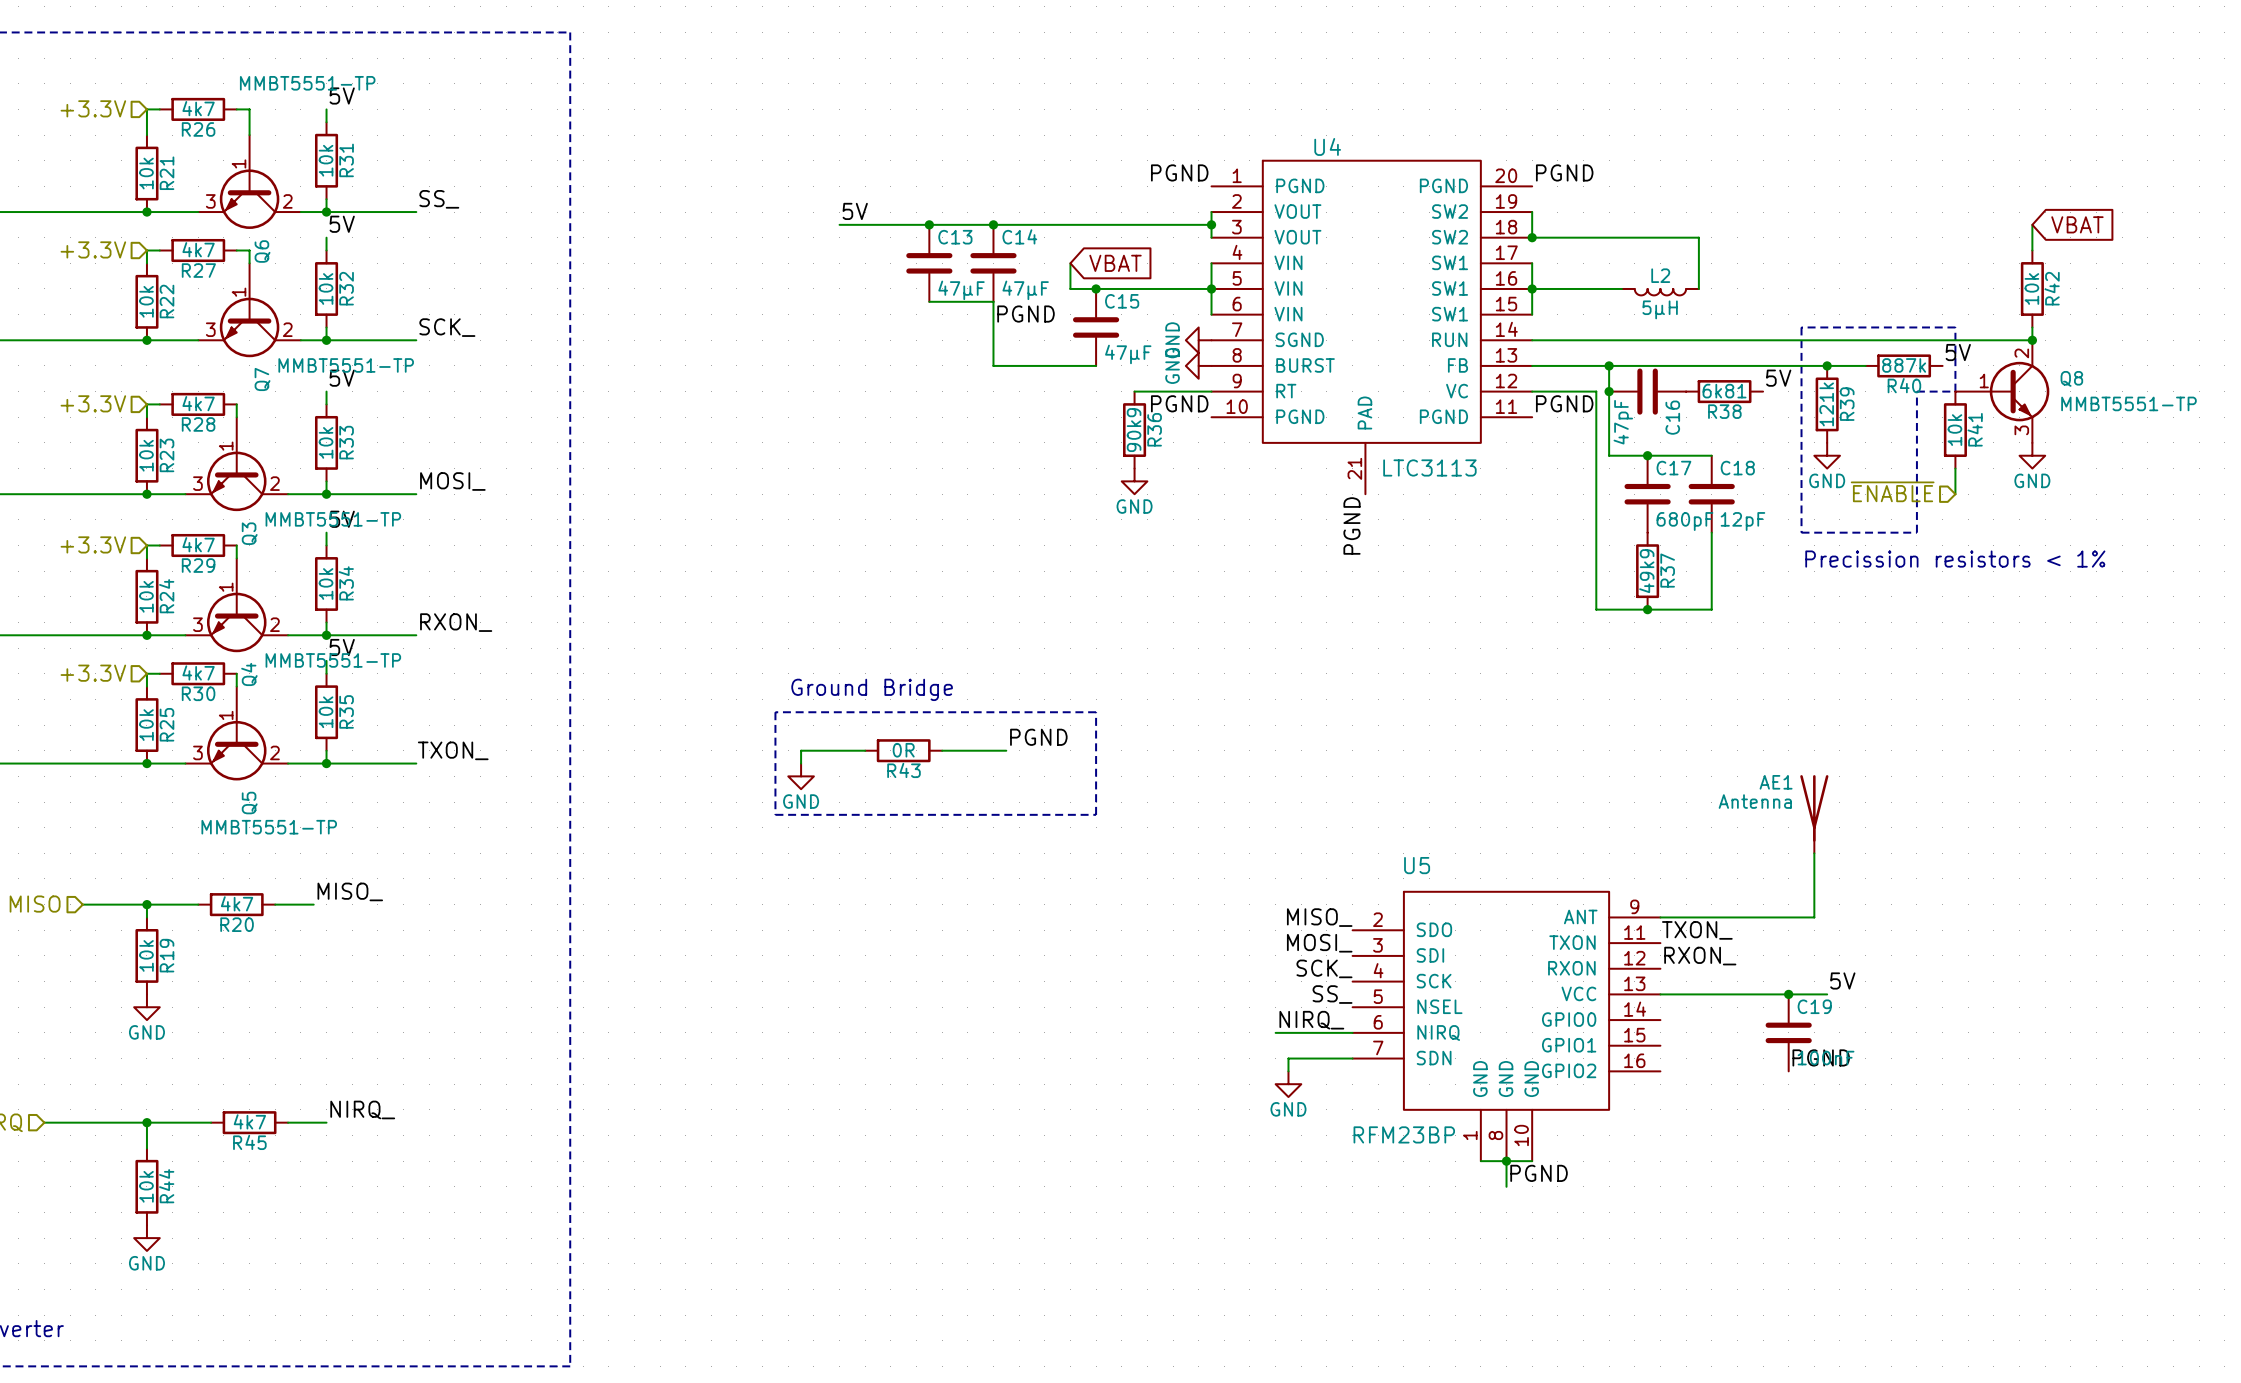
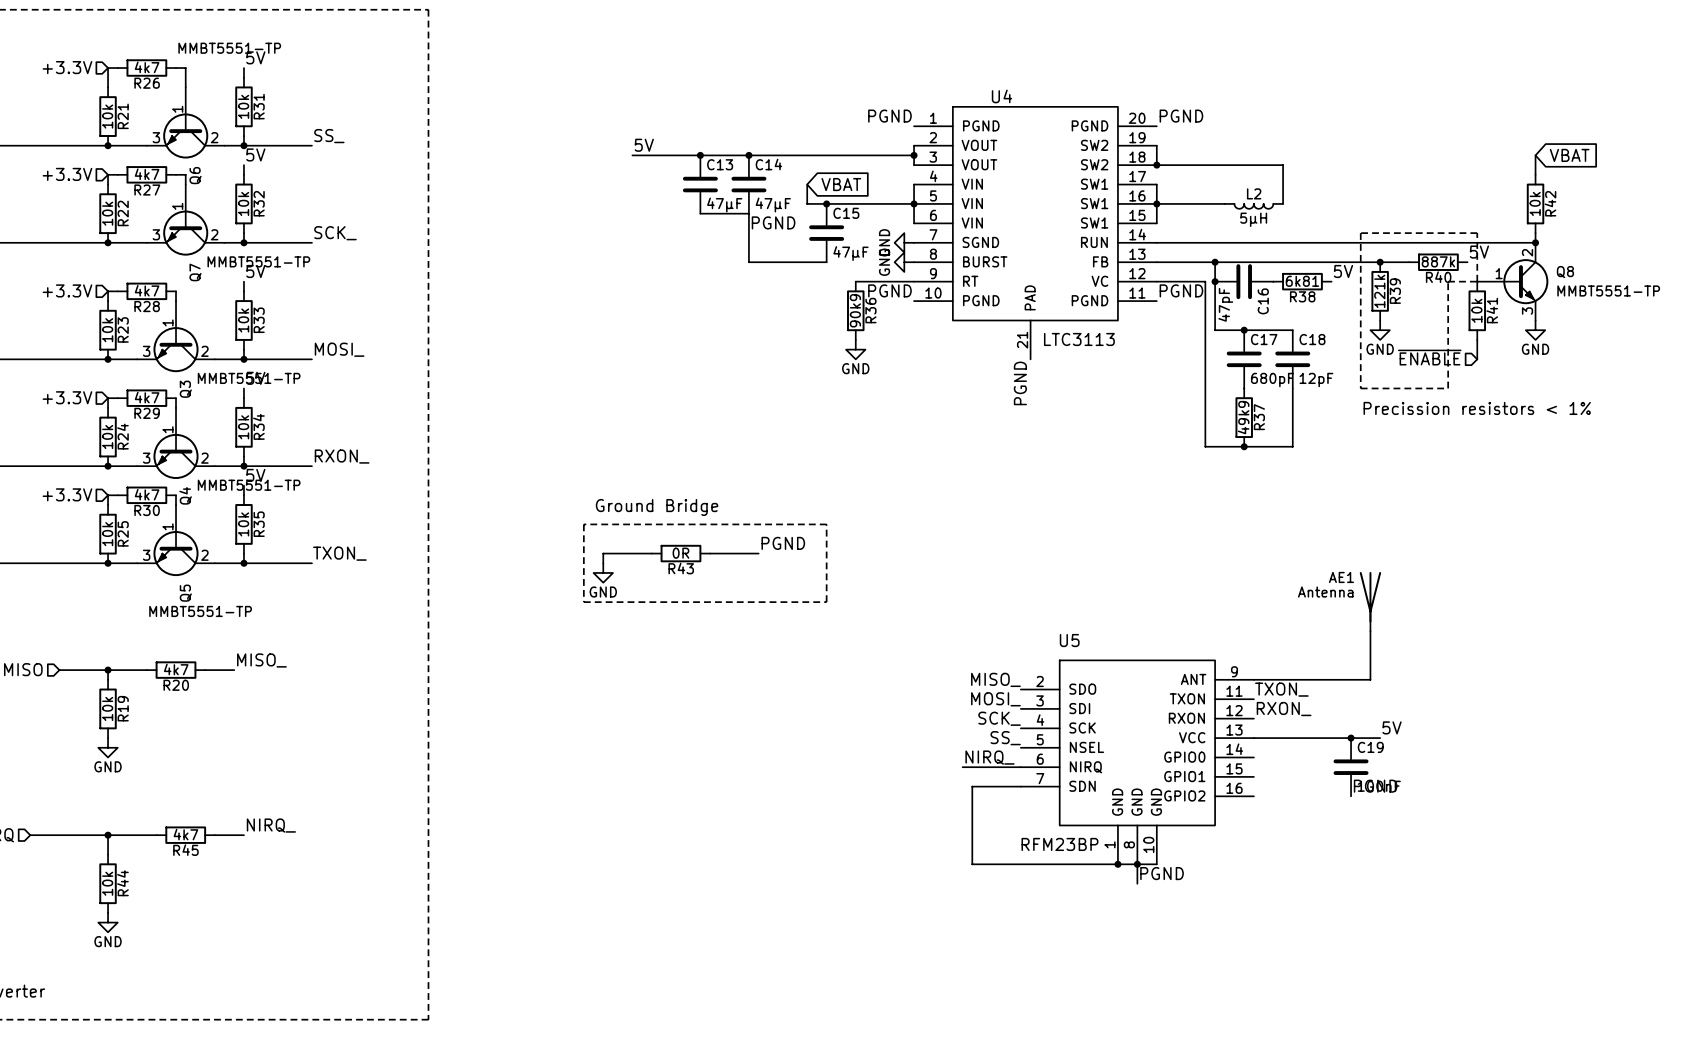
wire: none -> (972, 796) (972, 864) (1117, 864)
power symbol: GND (1288, 1084) -> none
junction: none -> (1117, 864)

